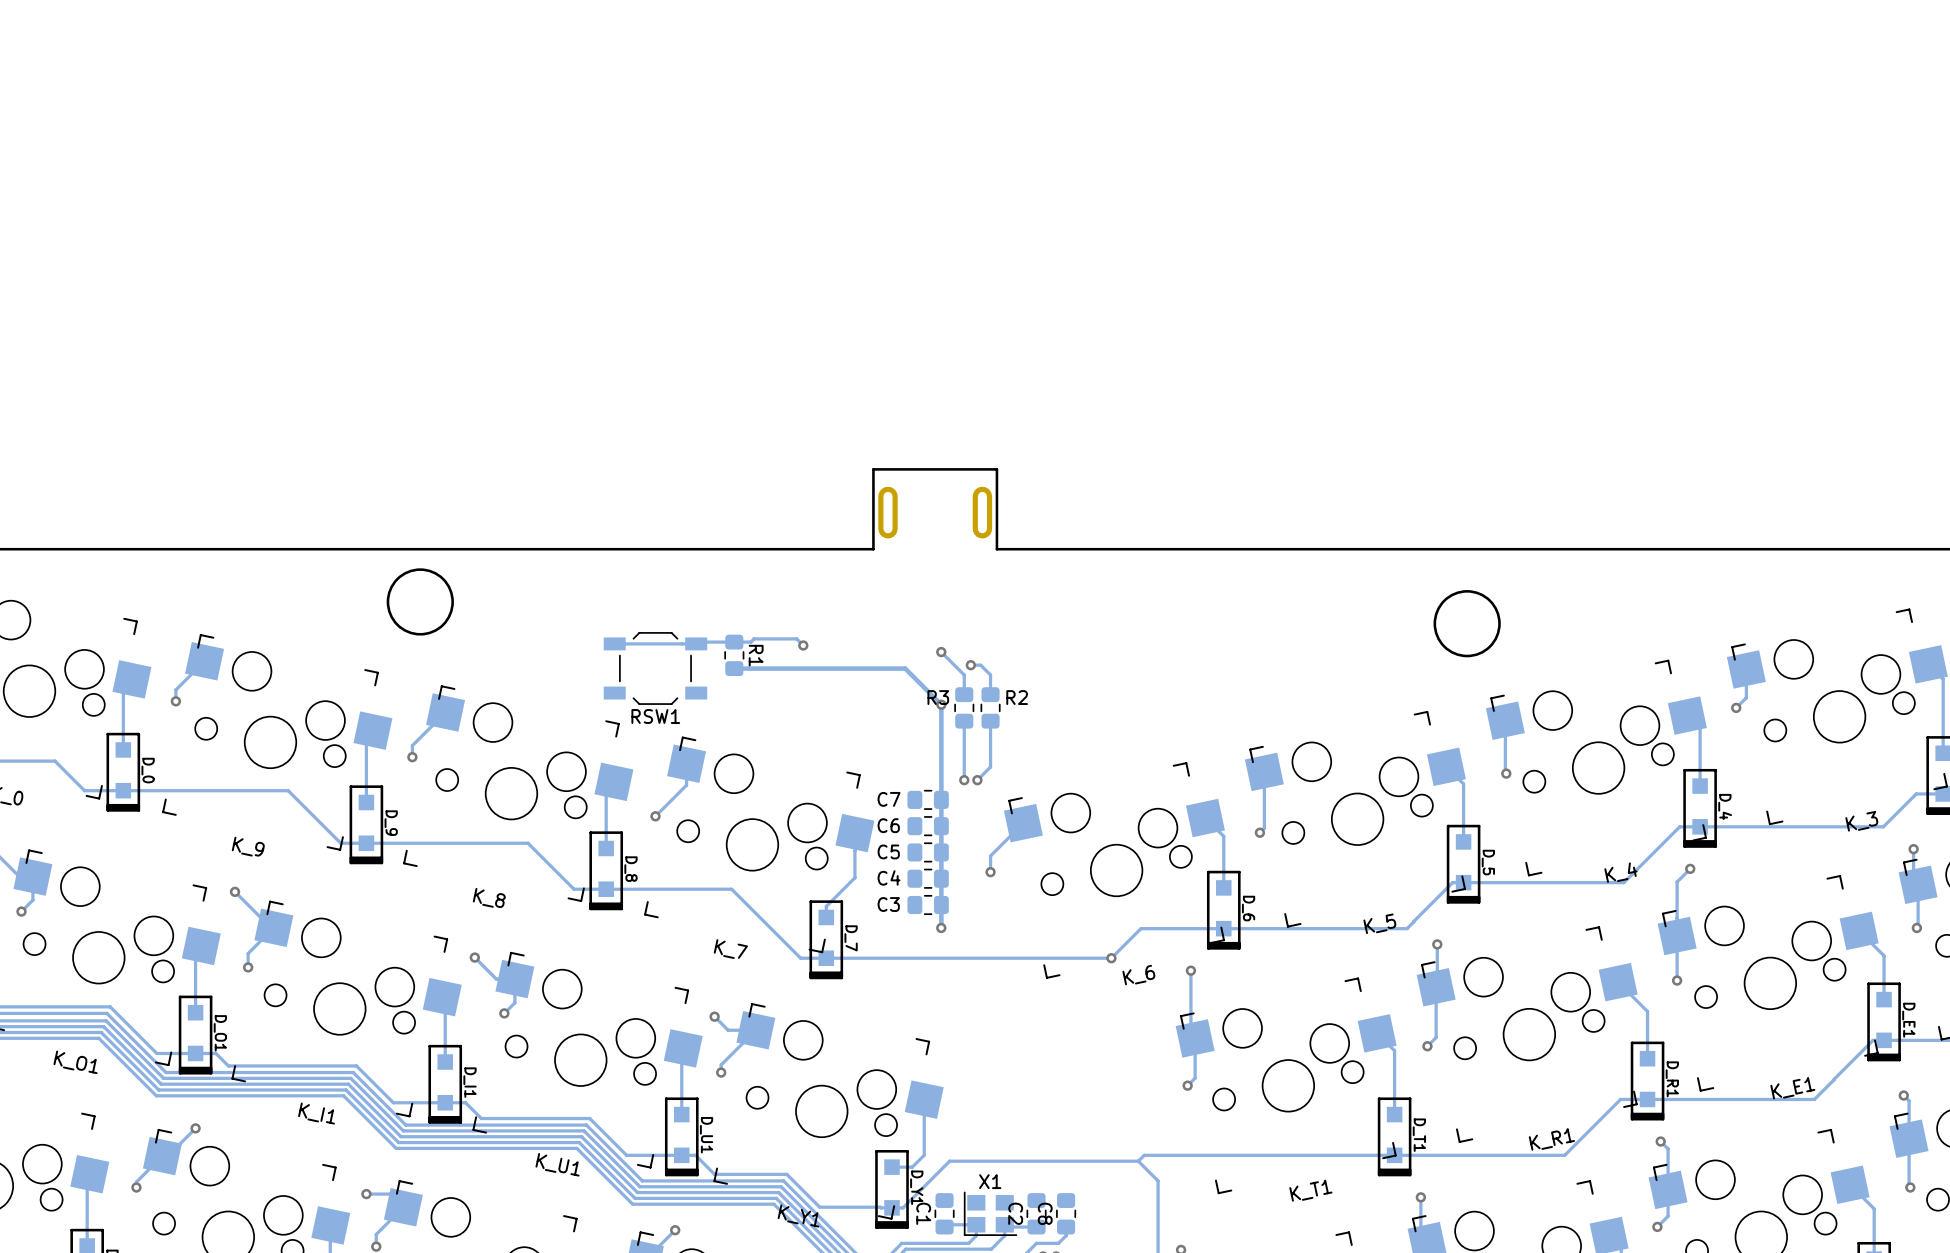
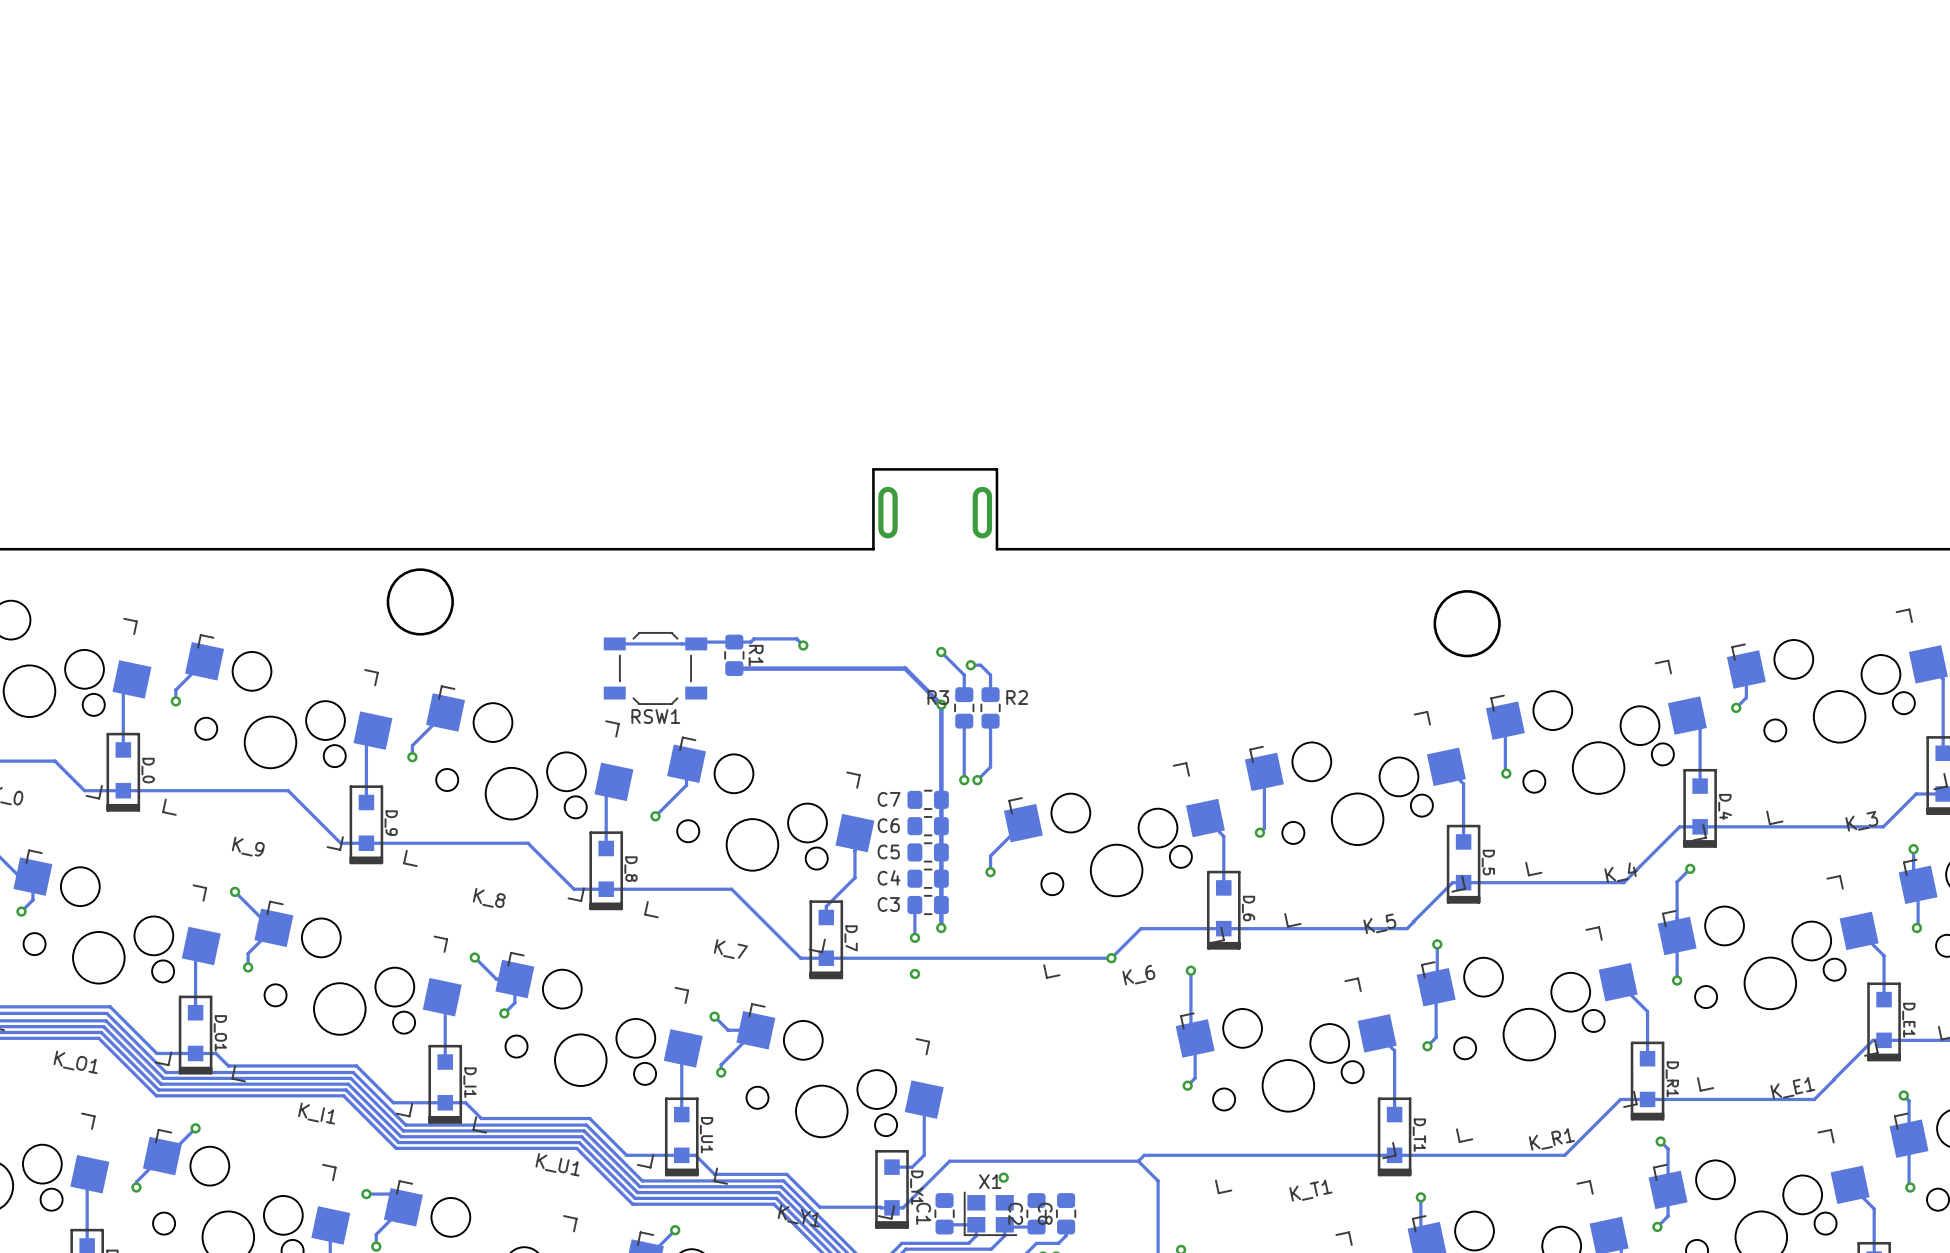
track: none -> (914, 905) (914, 937)
via: none -> (914, 937)
via: none -> (914, 973)
via: none -> (1003, 1177)

